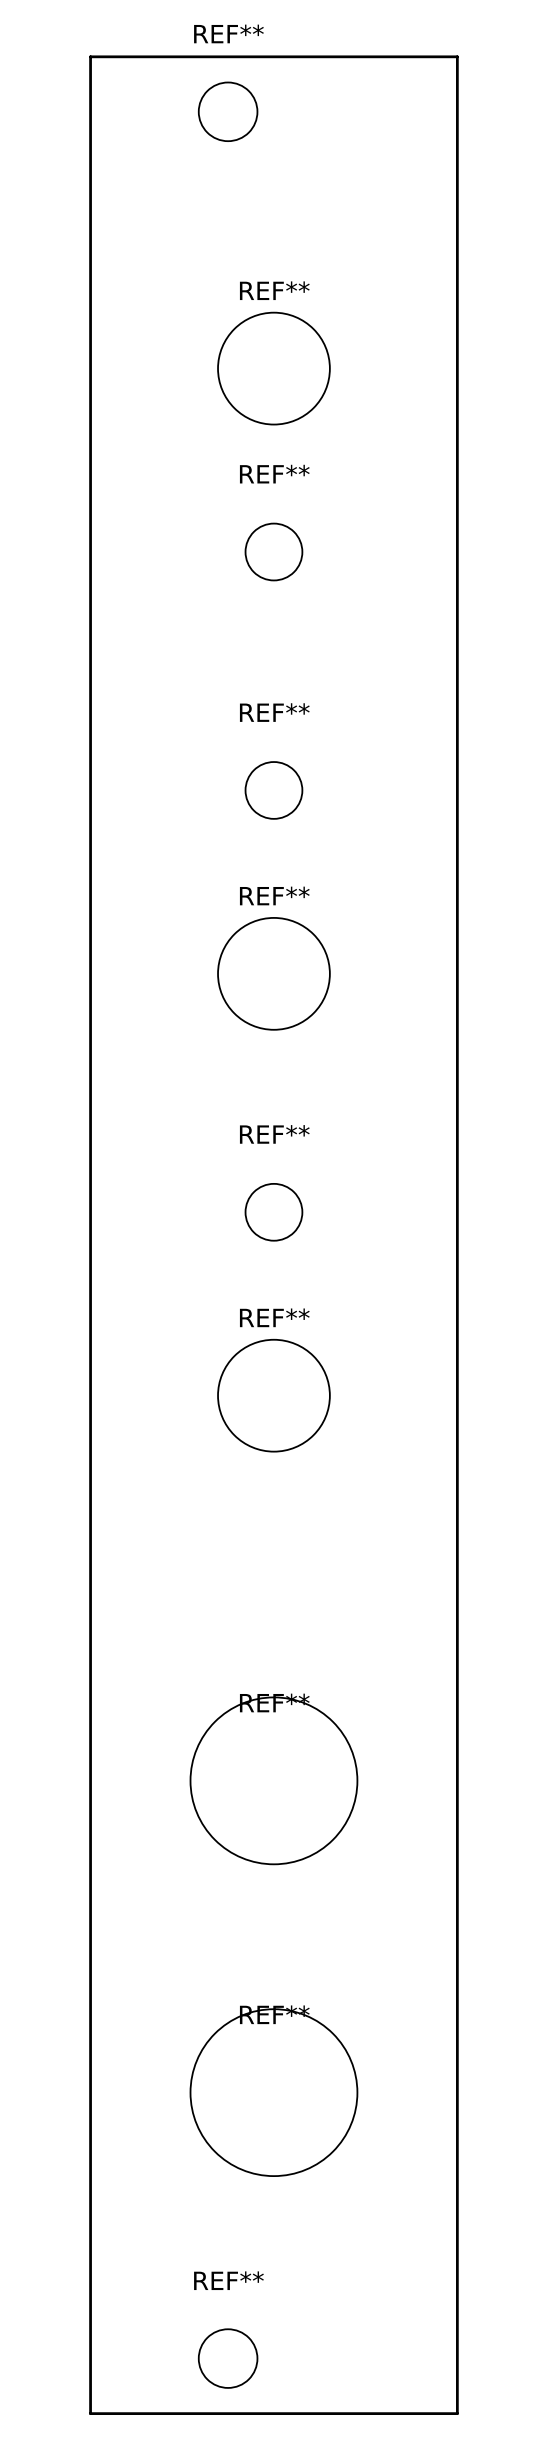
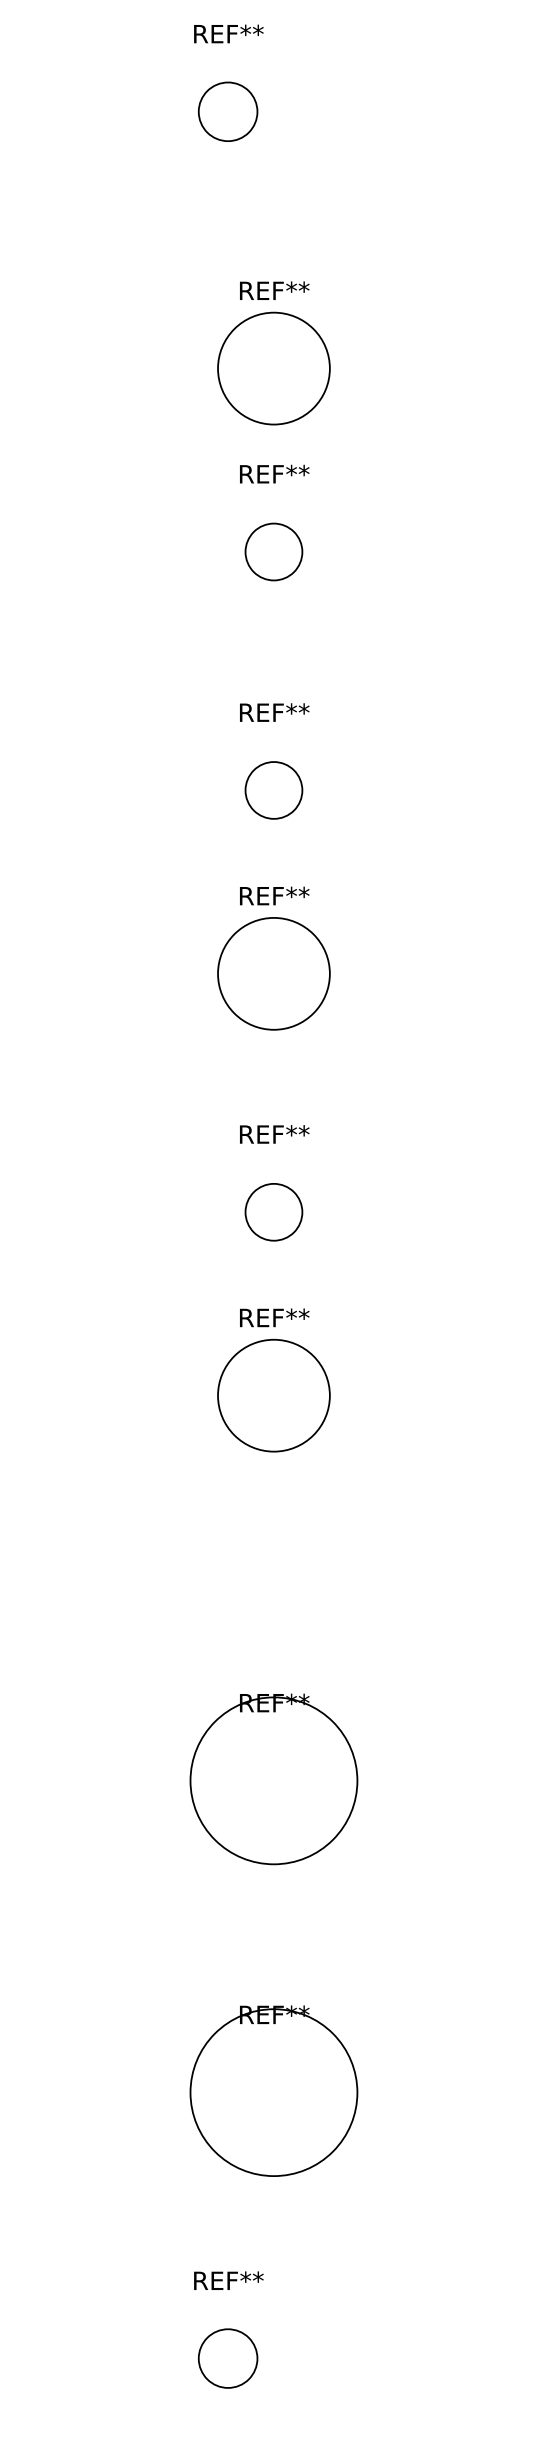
board edge: (90, 56) (90, 2413) (457, 2413) (457, 56) (90, 56) -> none

